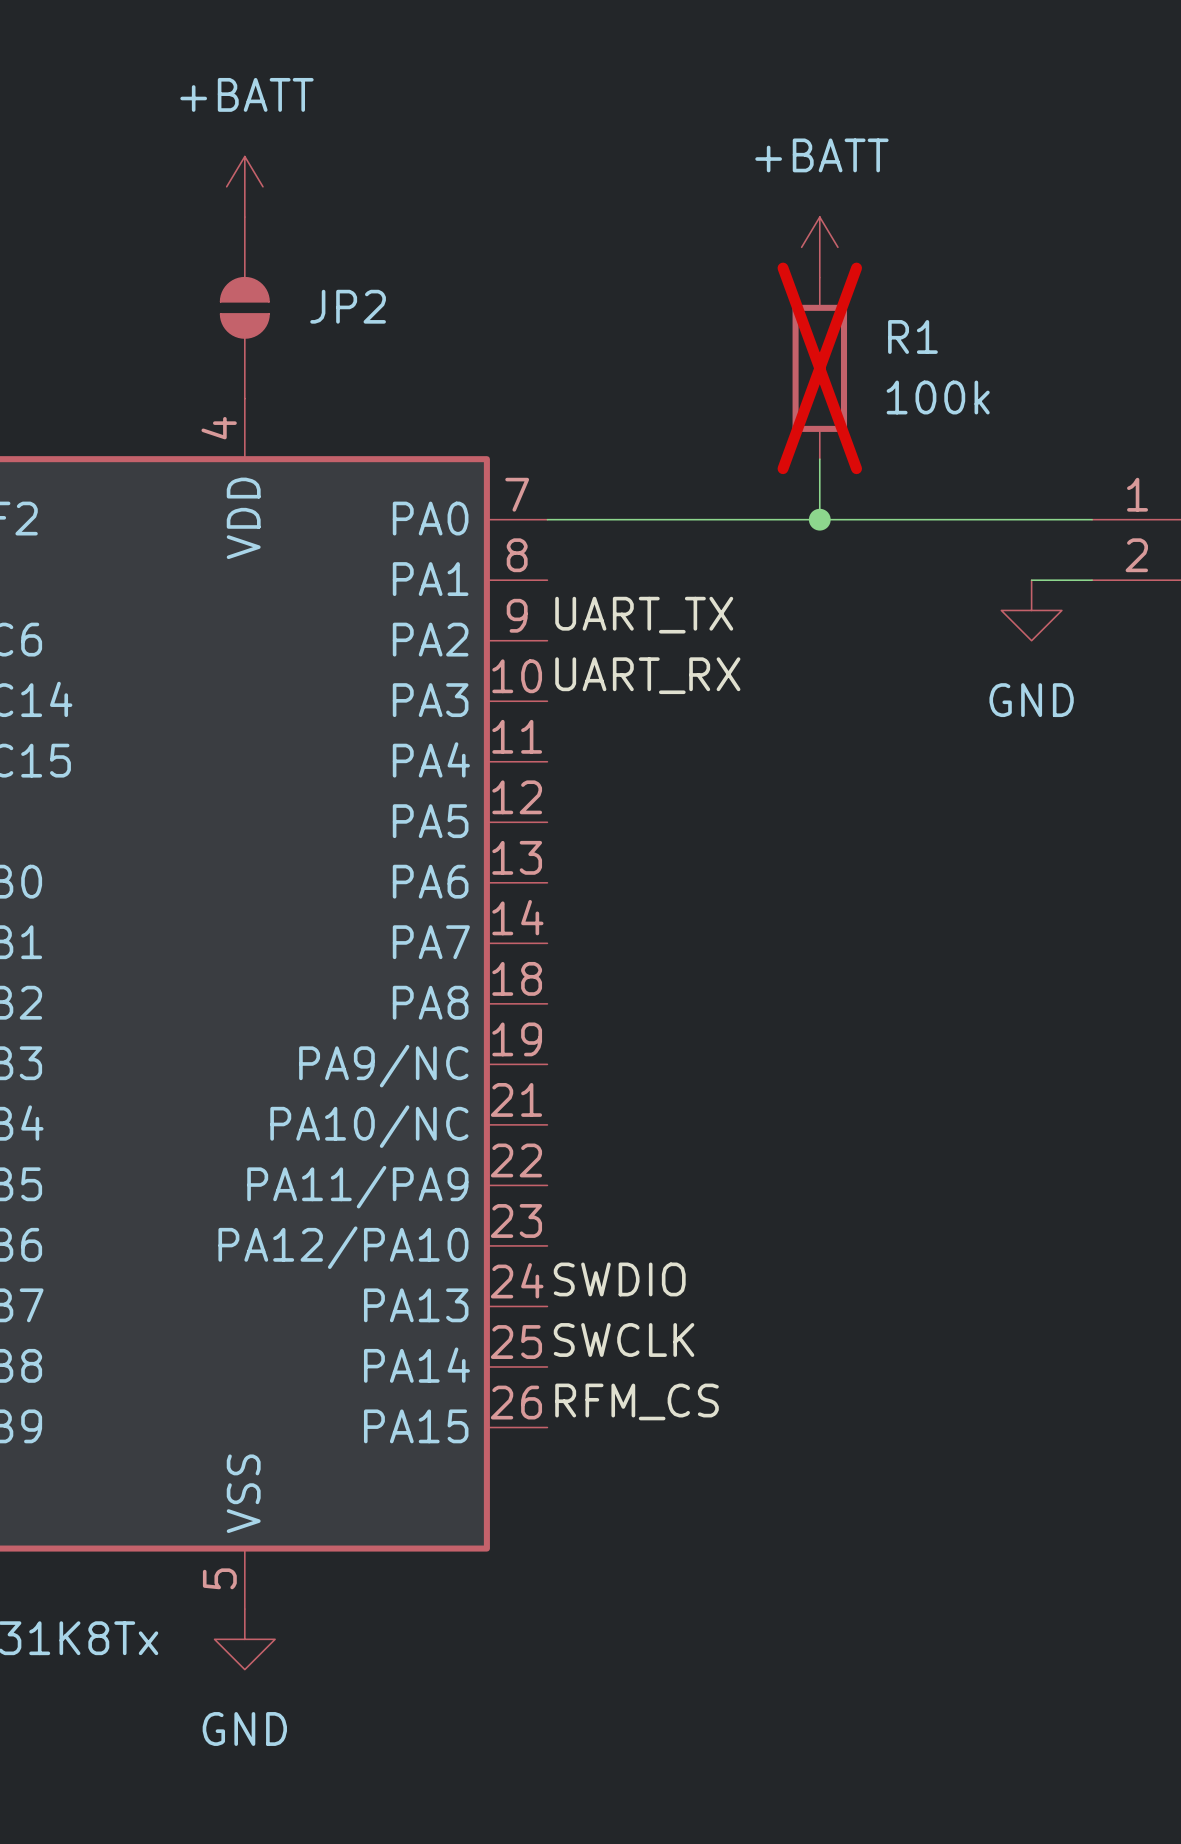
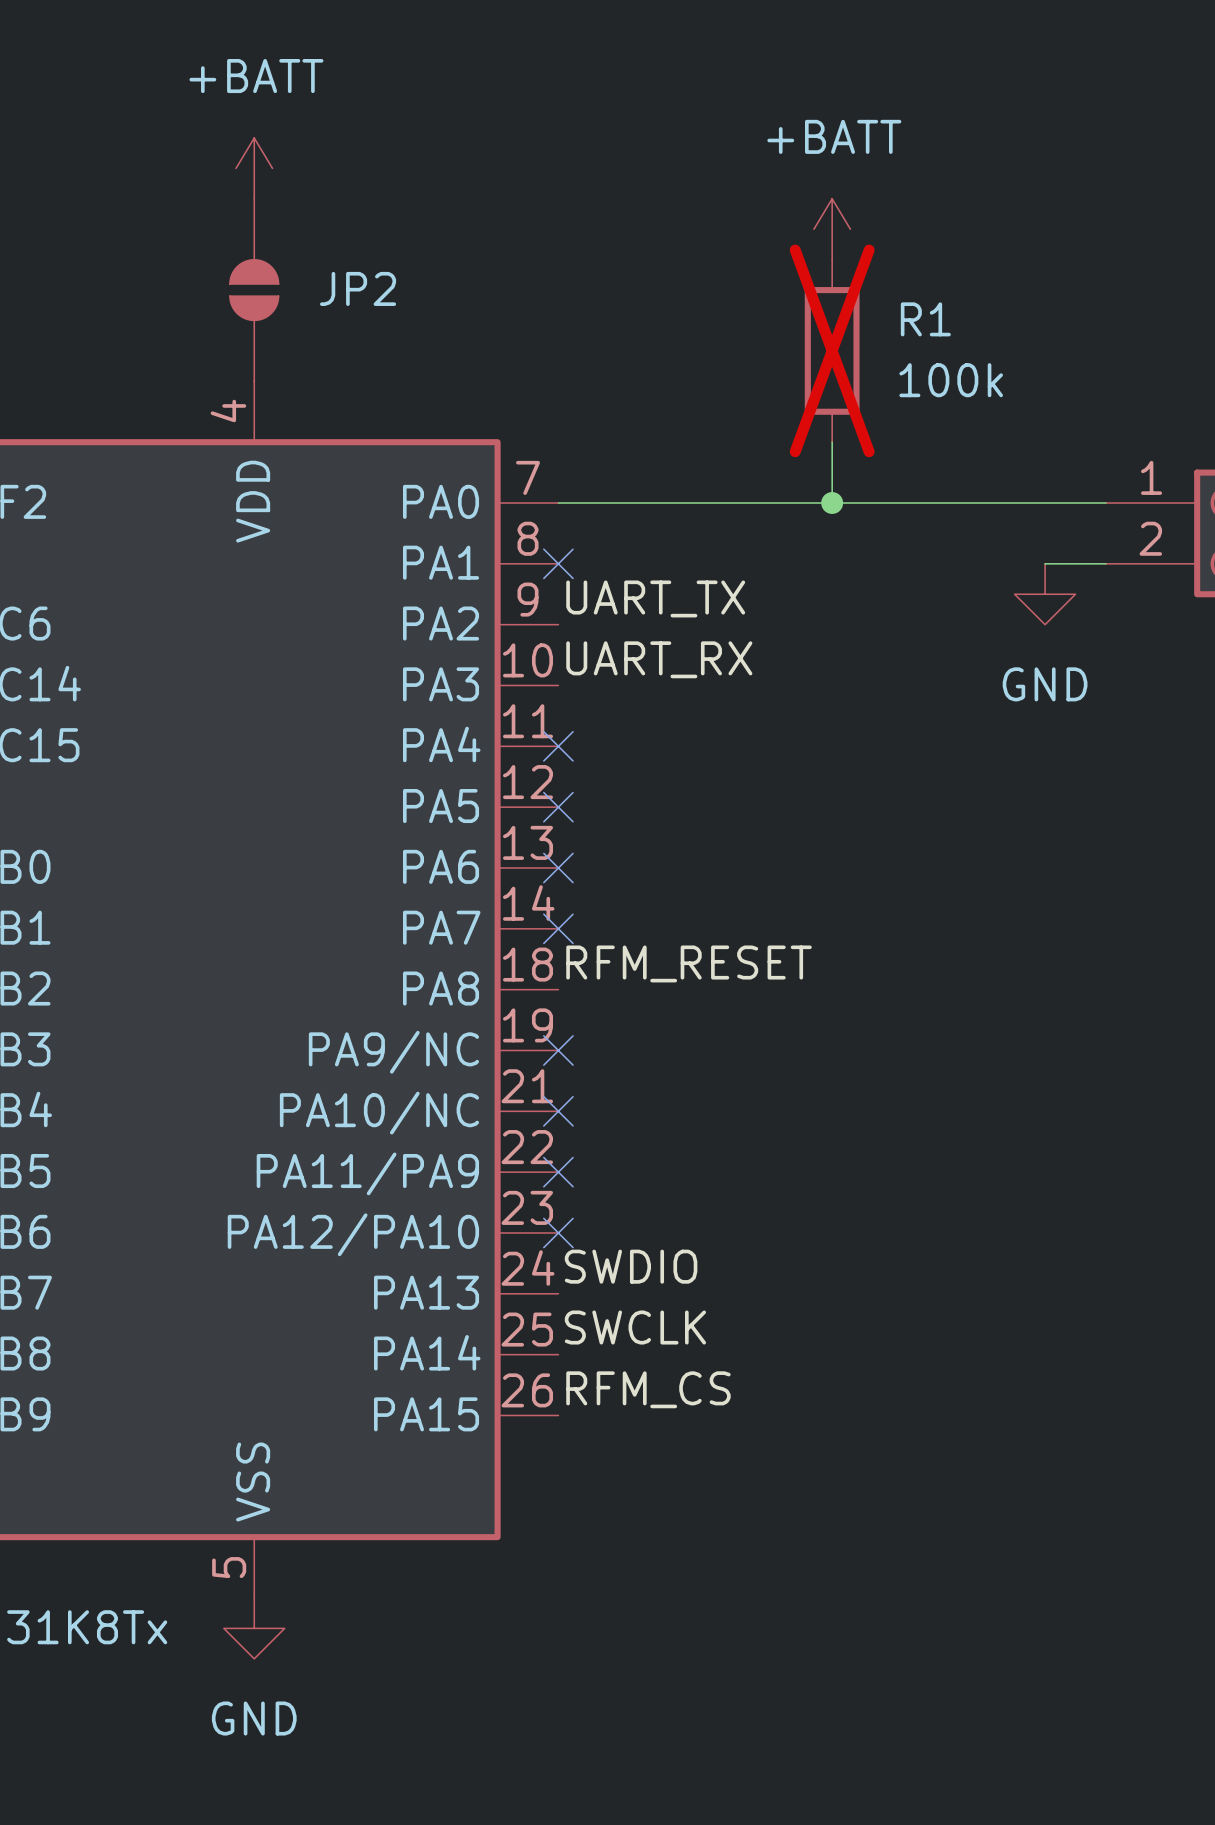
no-connect mark: none -> (558, 563)
no-connect mark: none -> (558, 746)
no-connect mark: none -> (558, 807)
no-connect mark: none -> (558, 867)
no-connect mark: none -> (558, 928)
label: none -> RFM_RESET (689, 963)
no-connect mark: none -> (558, 1050)
no-connect mark: none -> (558, 1111)
no-connect mark: none -> (558, 1172)
no-connect mark: none -> (558, 1232)

